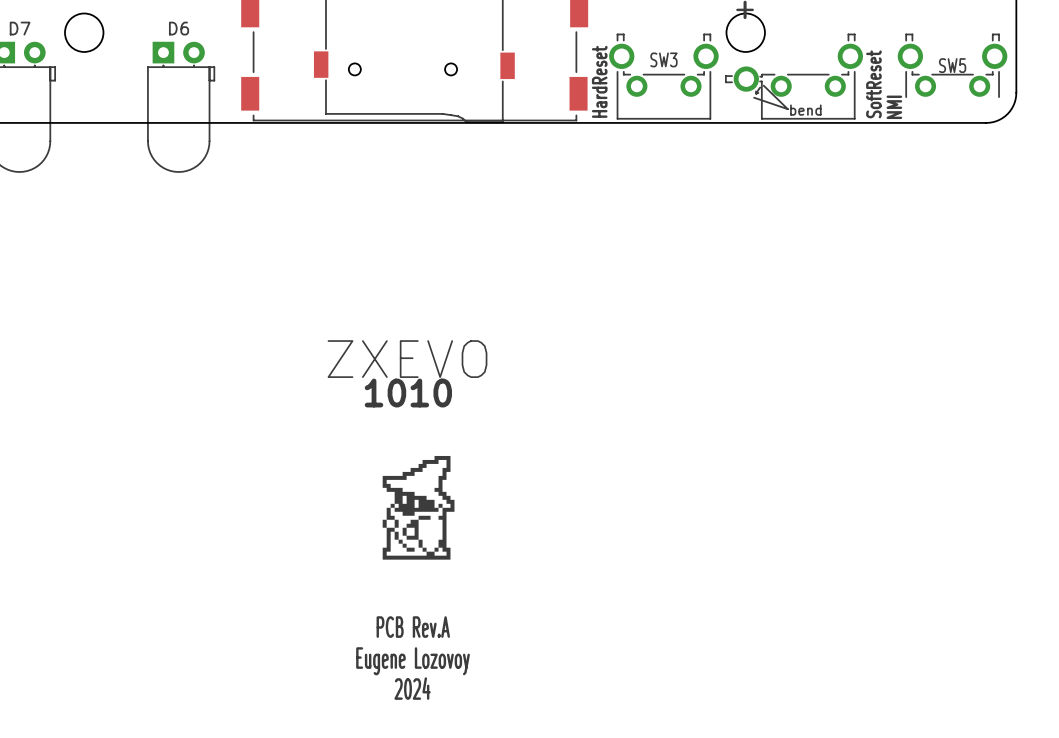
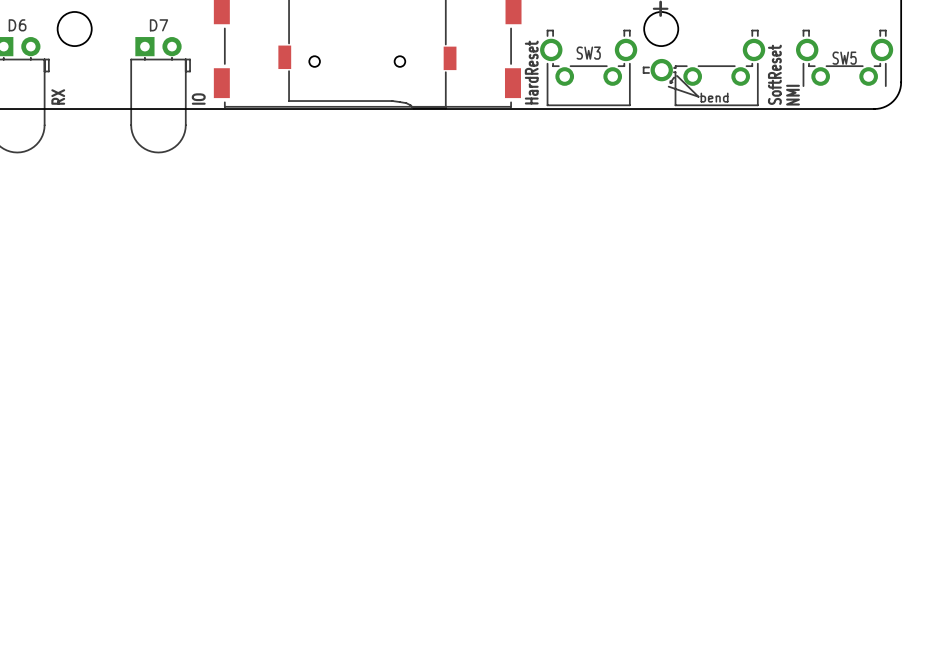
D7 name: D7 (20, 28) -> D6 (17, 25)
D6 name: D6 (179, 28) -> D7 (158, 25)
D7 text: none -> RX (58, 97)
D6 text: none -> IO (198, 99)
text: ZXEVO (407, 359) -> none
text: 1010 (408, 393) -> none
drawing: [382, 455, 455, 560] -> none
text: PCB Rev.A (413, 627) -> none
text: Eugene Lozovoy (413, 661) -> none
text: 2024 (412, 688) -> none

